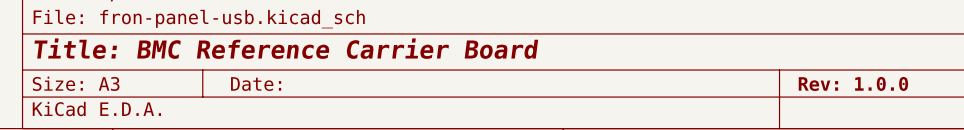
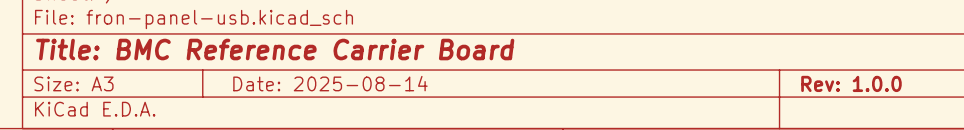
title block: Date: (256, 84) -> Date: 2025-08-14 (330, 83)

